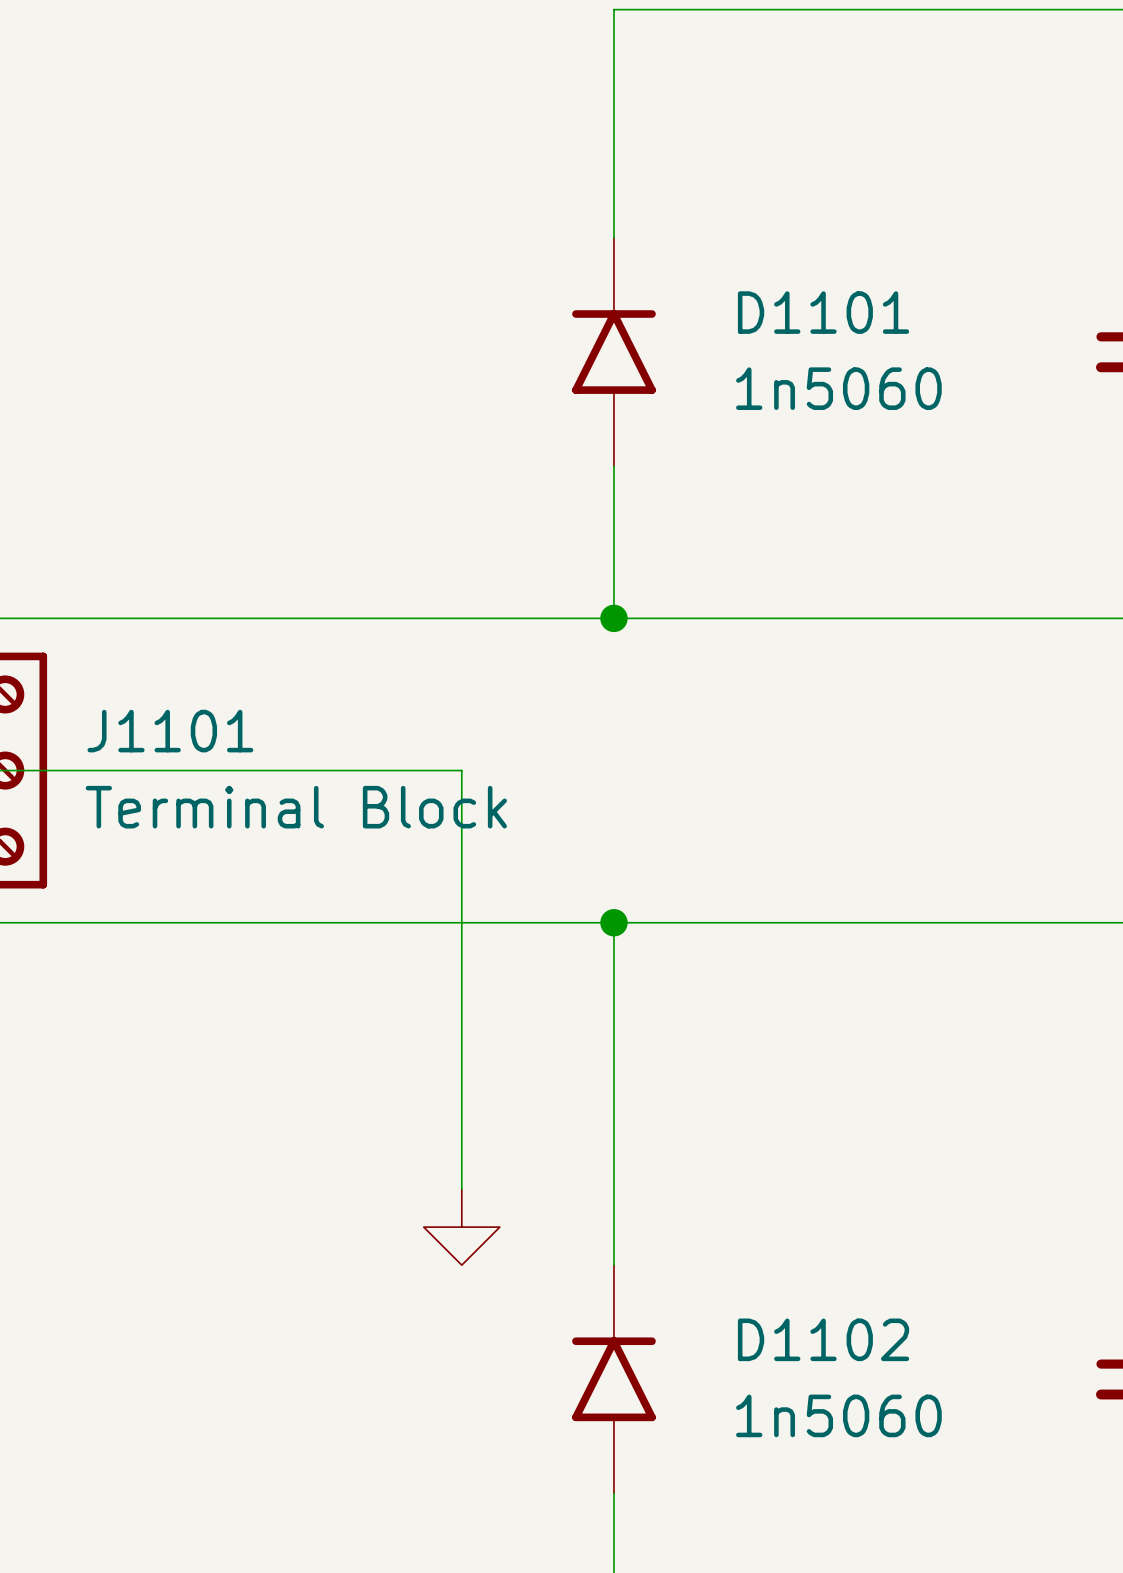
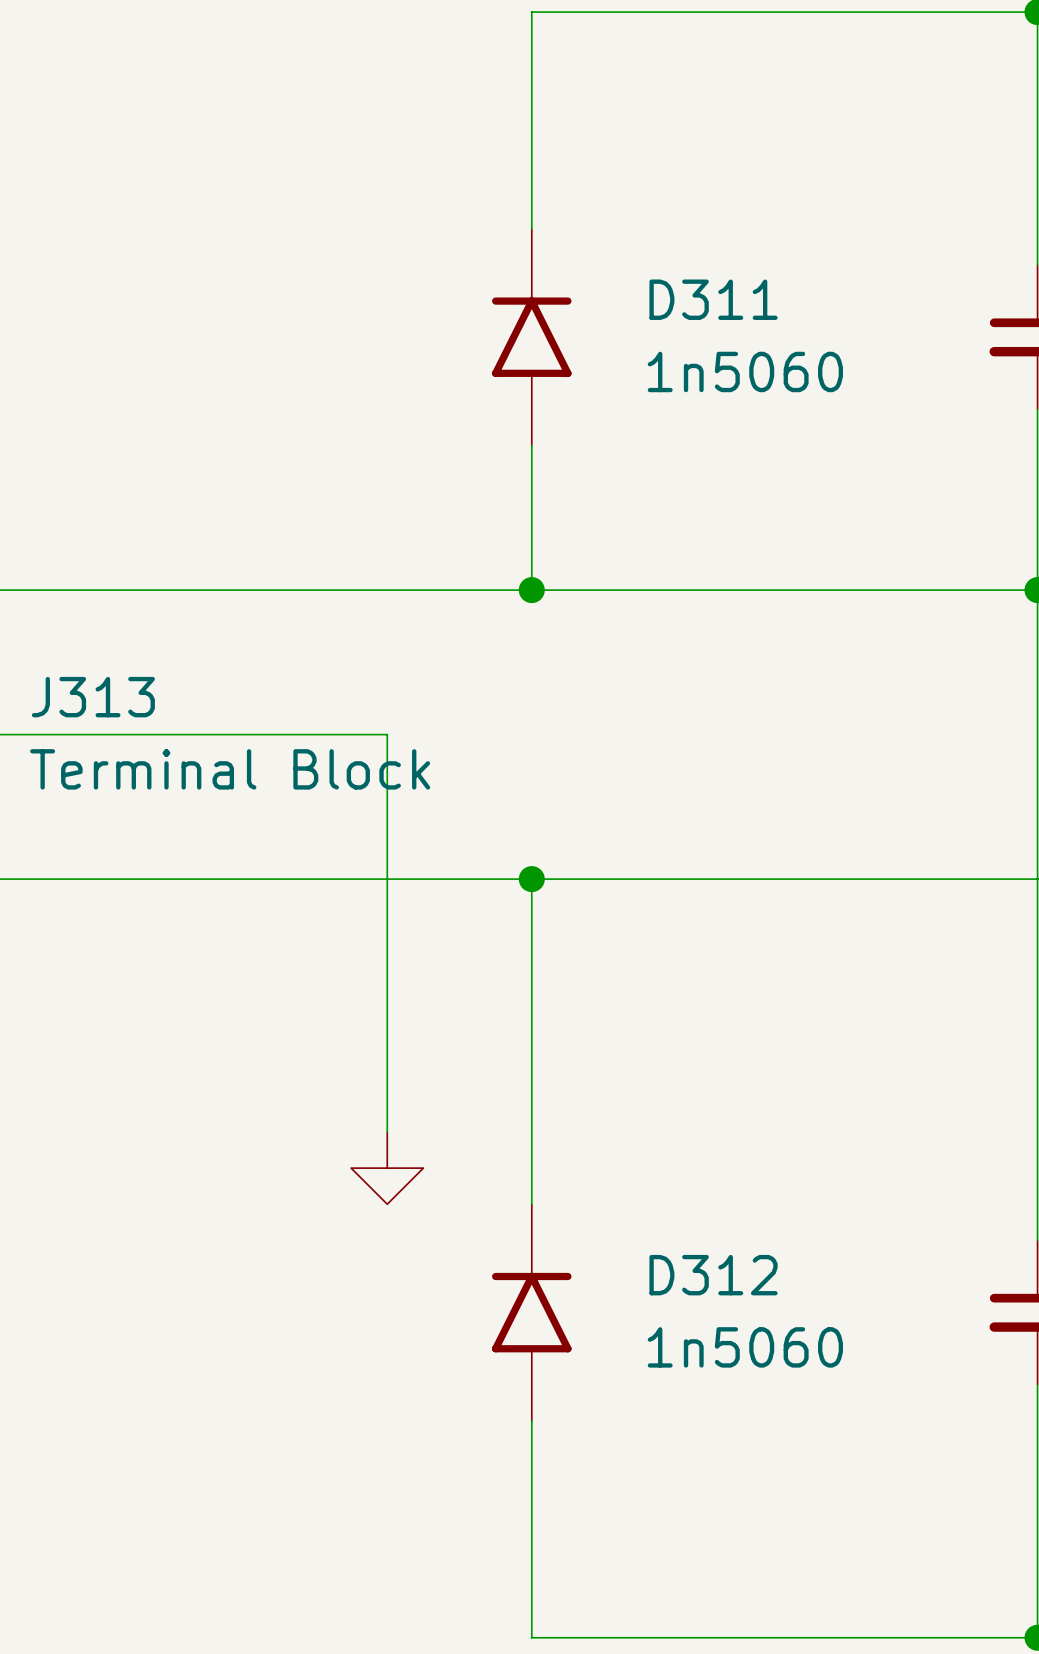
D1101 name: D1101 (823, 312) -> D311 (713, 299)
J1101 name: J1101 (170, 731) -> J313 (93, 697)
D1102 name: D1102 (823, 1339) -> D312 (713, 1275)

